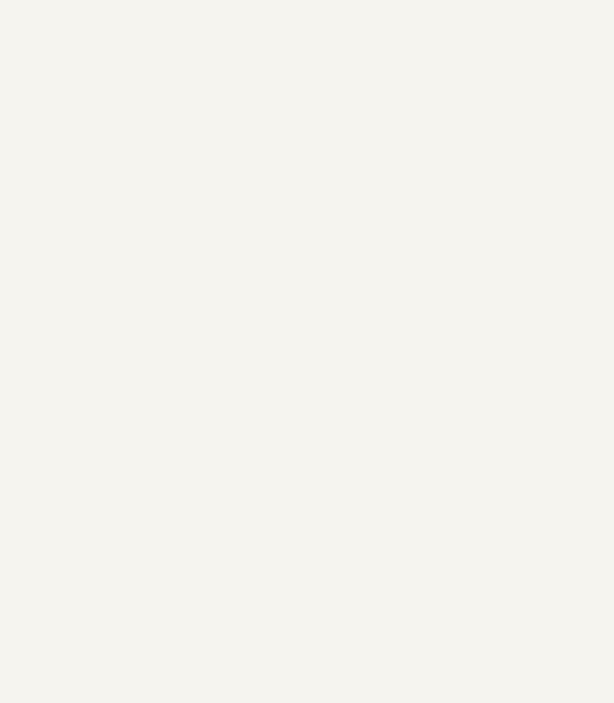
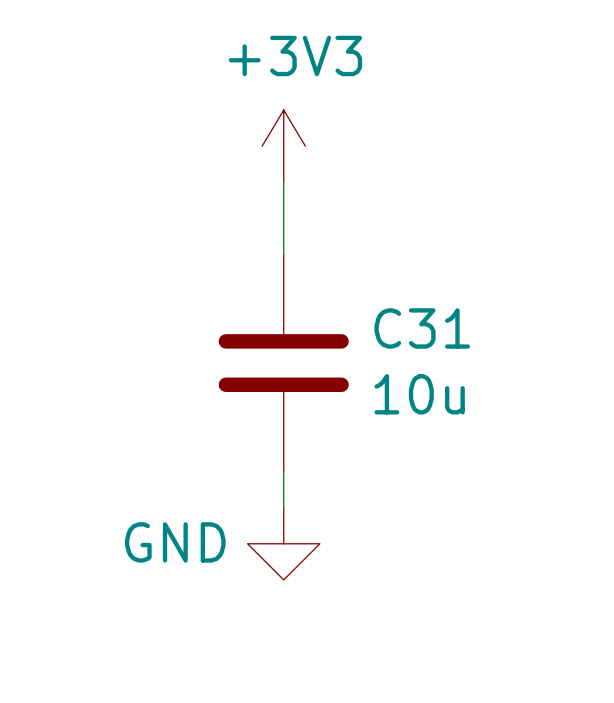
power symbol: none -> +3V3 (283, 146)
wire: none -> (283, 182) (283, 254)
C31: none -> 10u (283, 363)
wire: none -> (283, 471) (283, 507)
power symbol: none -> GND (283, 543)

